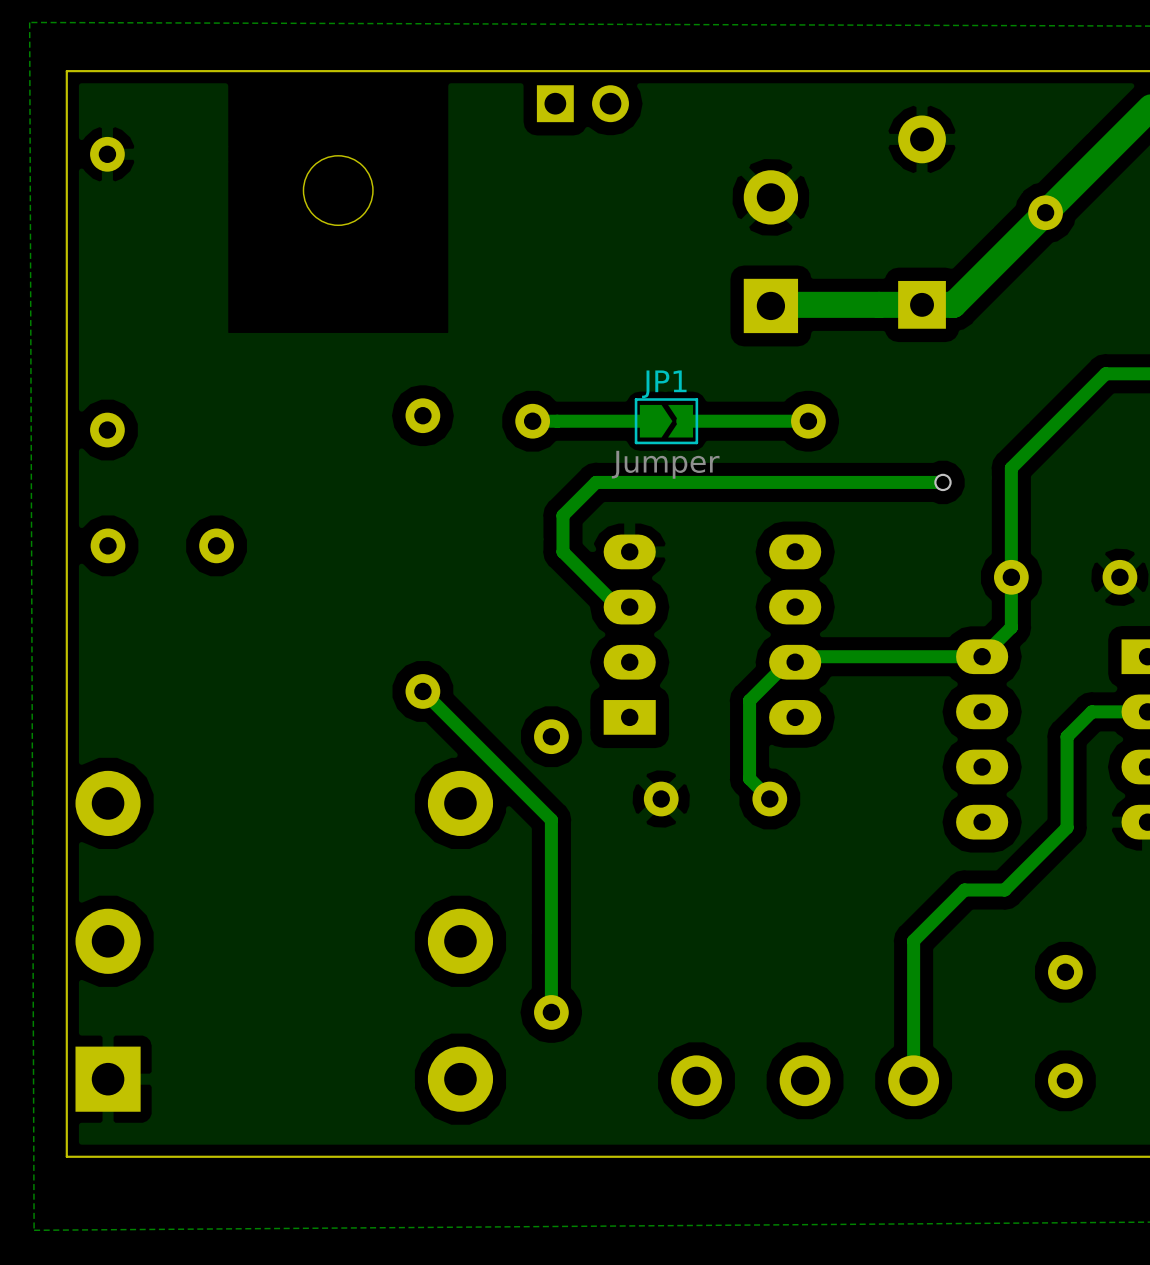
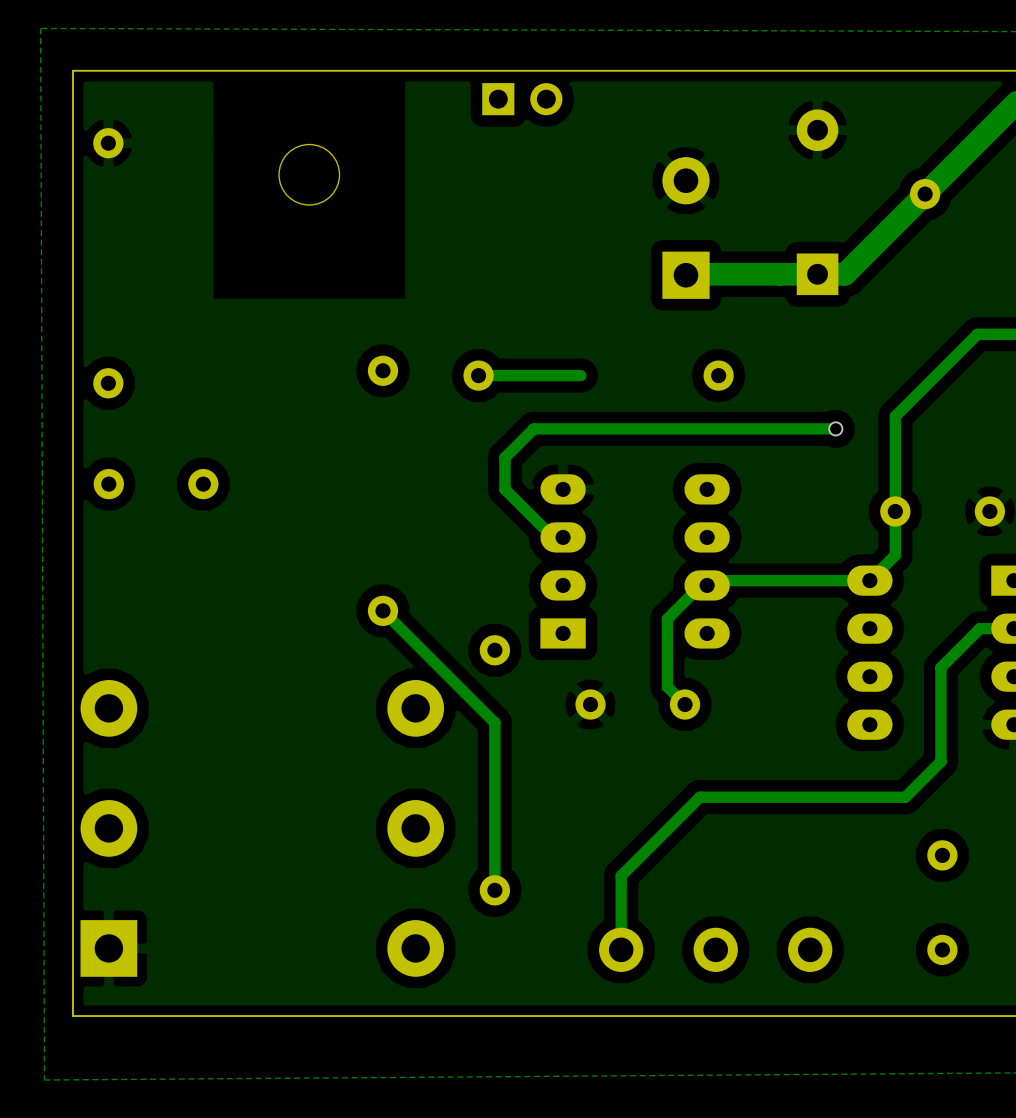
JP1: Jumper (666, 421) -> none
track: (808, 421) (682, 421) -> none
track: (1108, 711) (1091, 711) (1067, 736) (1067, 827) (1004, 890) (964, 890) (913, 940) (913, 1080) -> (979, 628) (940, 667) (940, 761) (905, 797) (699, 797) (621, 875) (621, 949)

